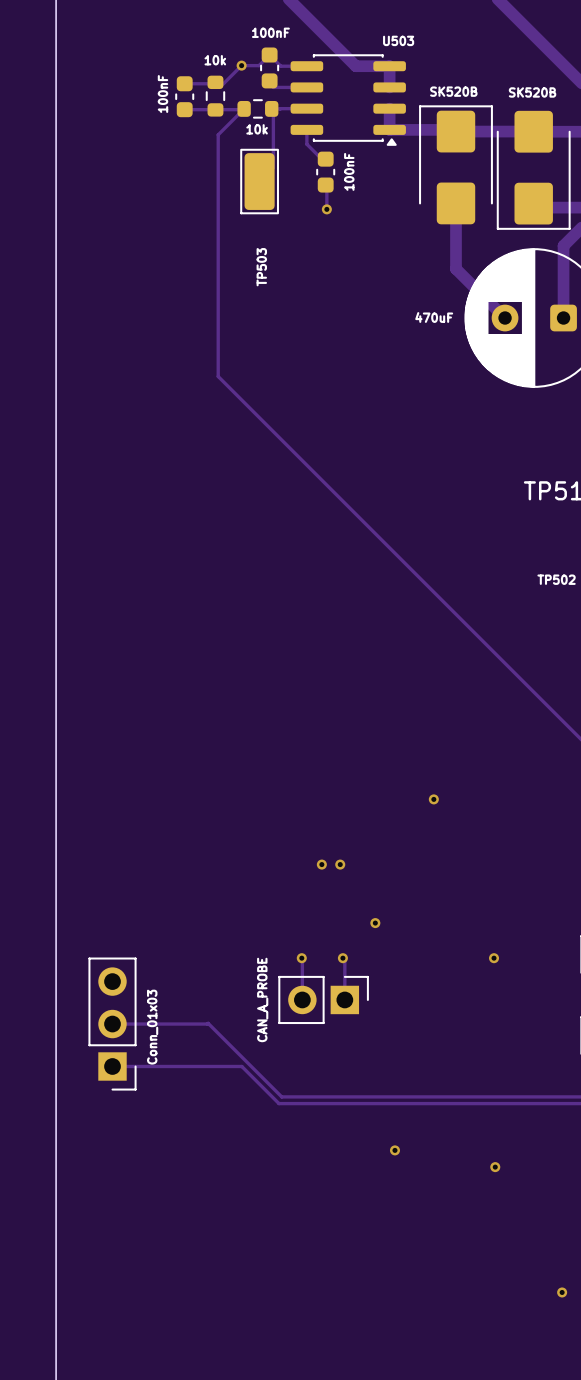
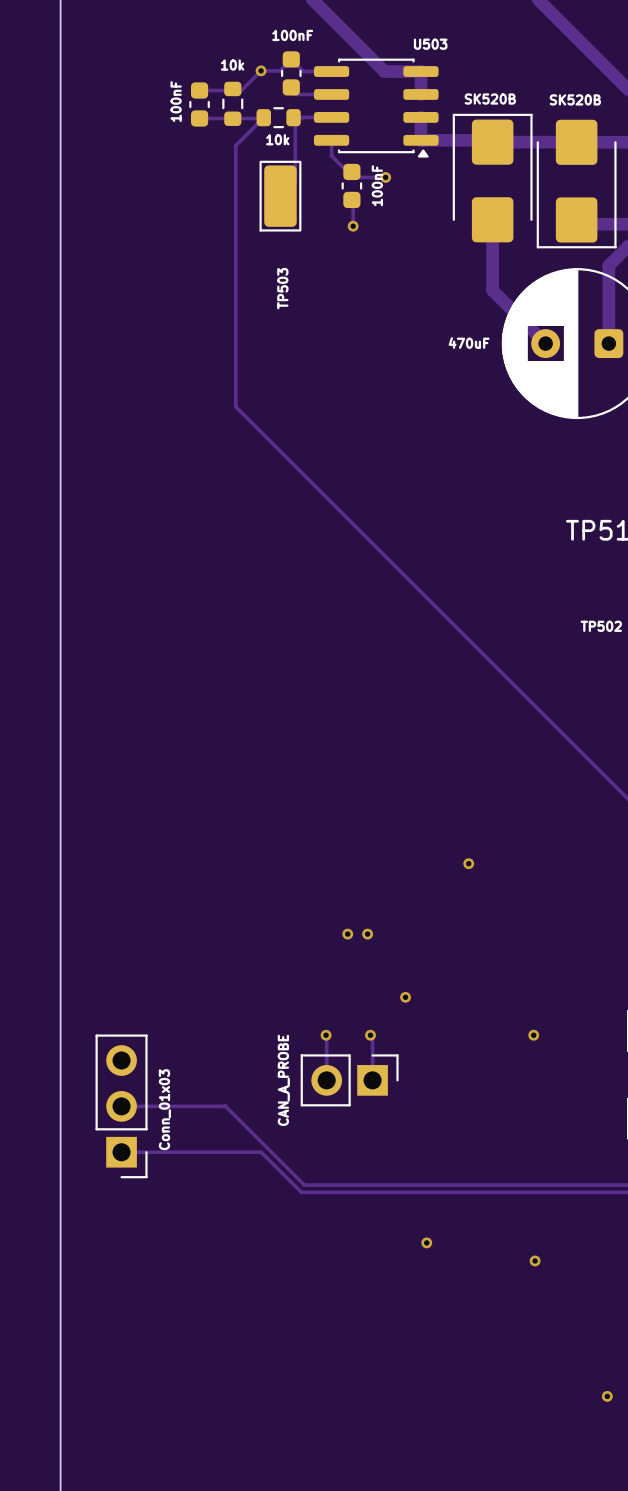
track: none -> (351, 171) (357, 177) (385, 177)
via: none -> (385, 177)

